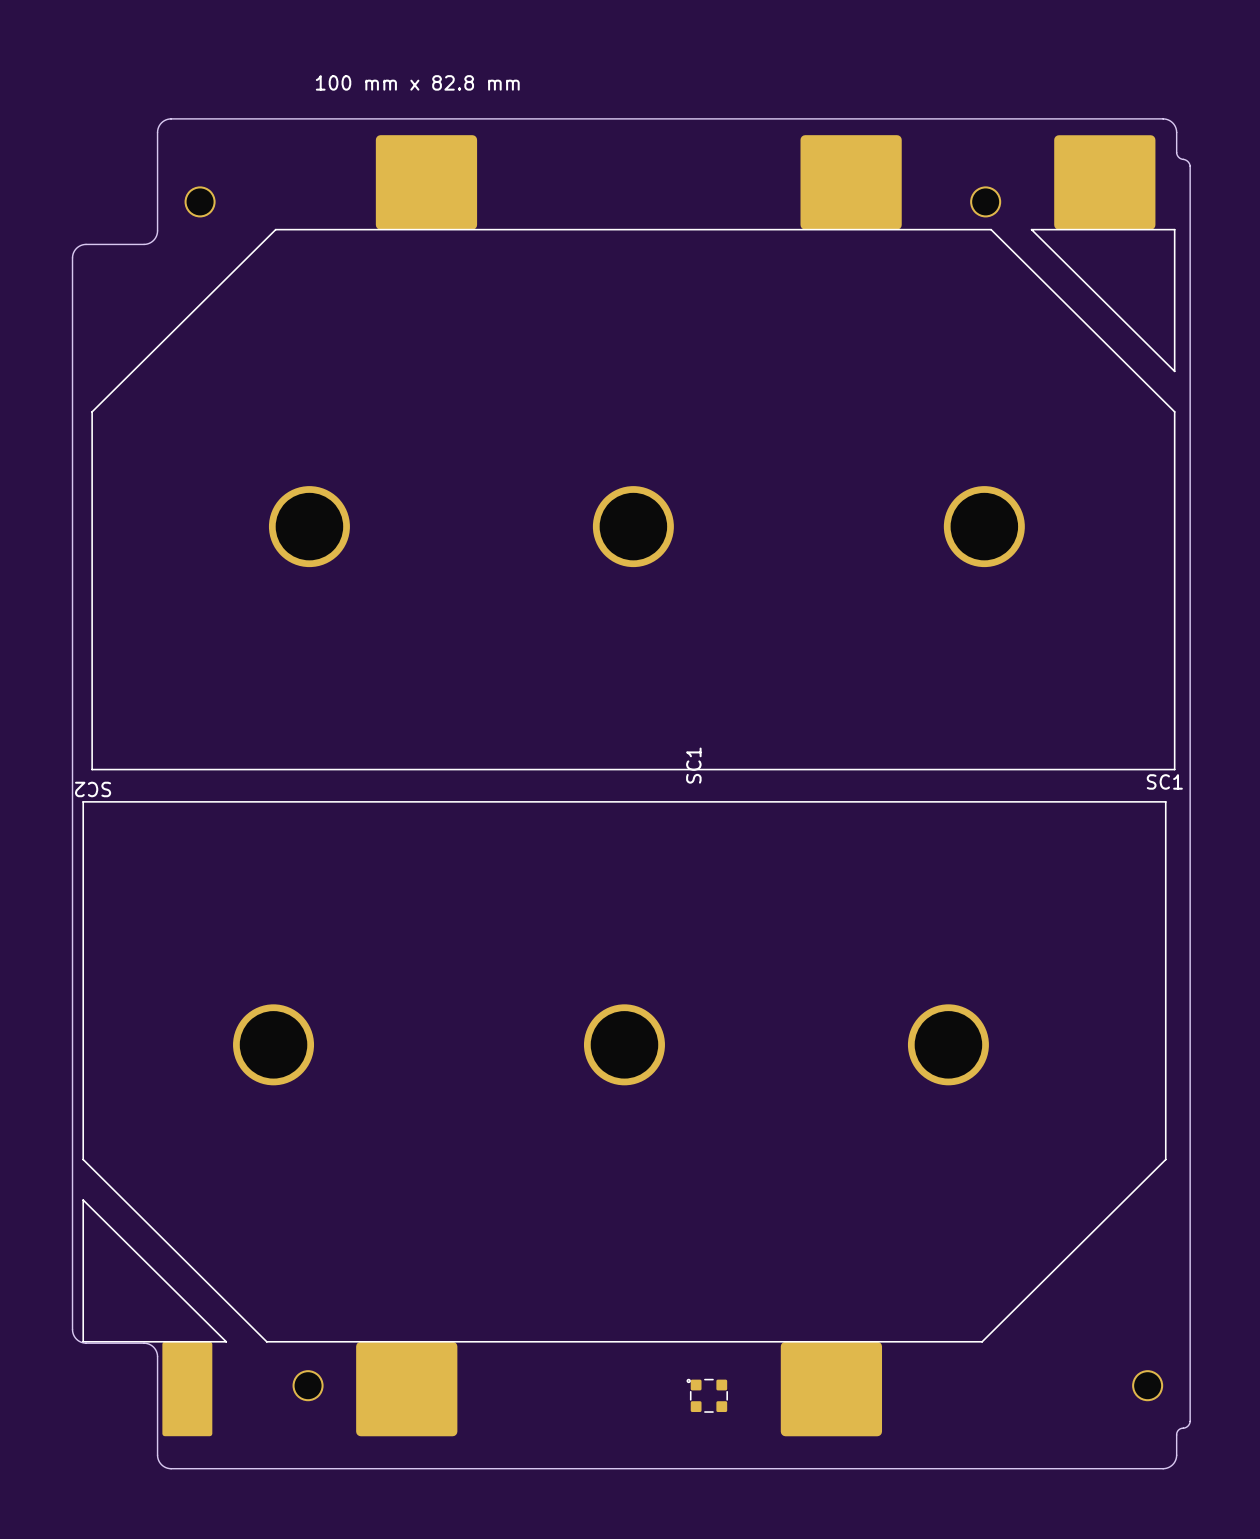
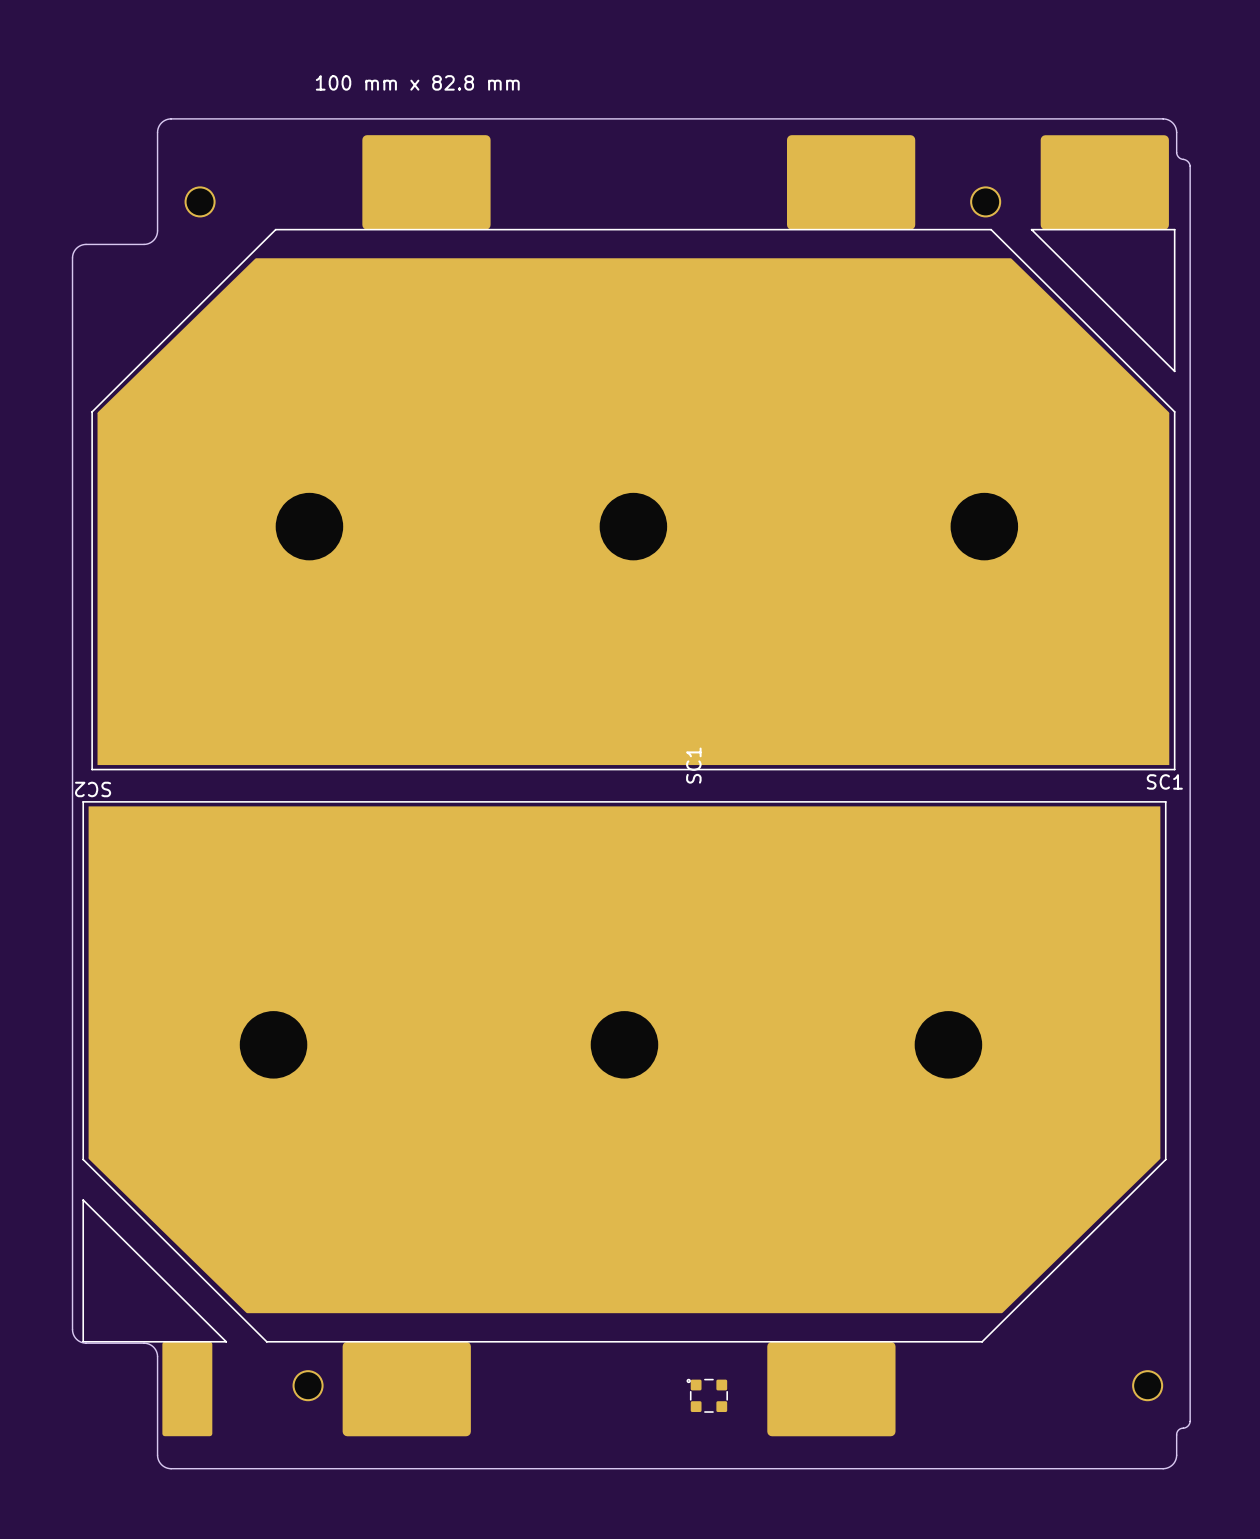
SC1 footprint: [91, 135, 1176, 771] -> [91, 135, 1176, 771]
SC2 footprint: [82, 801, 1167, 1437] -> [82, 801, 1167, 1437]

